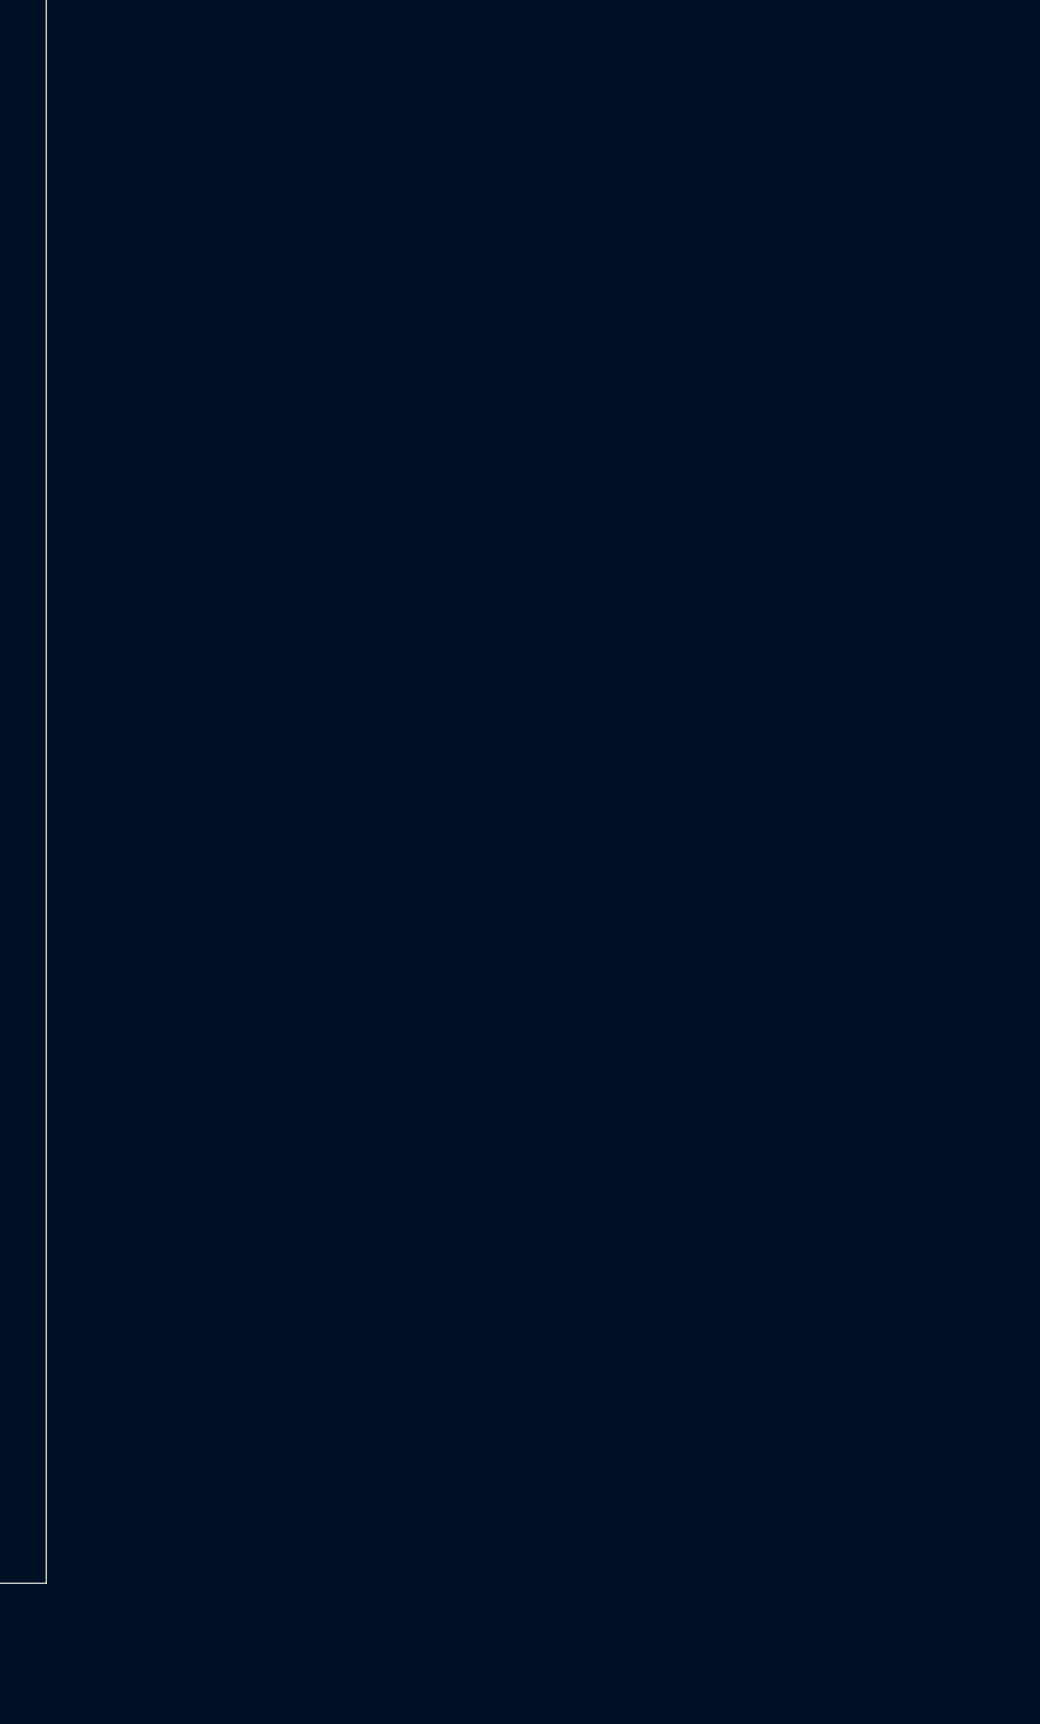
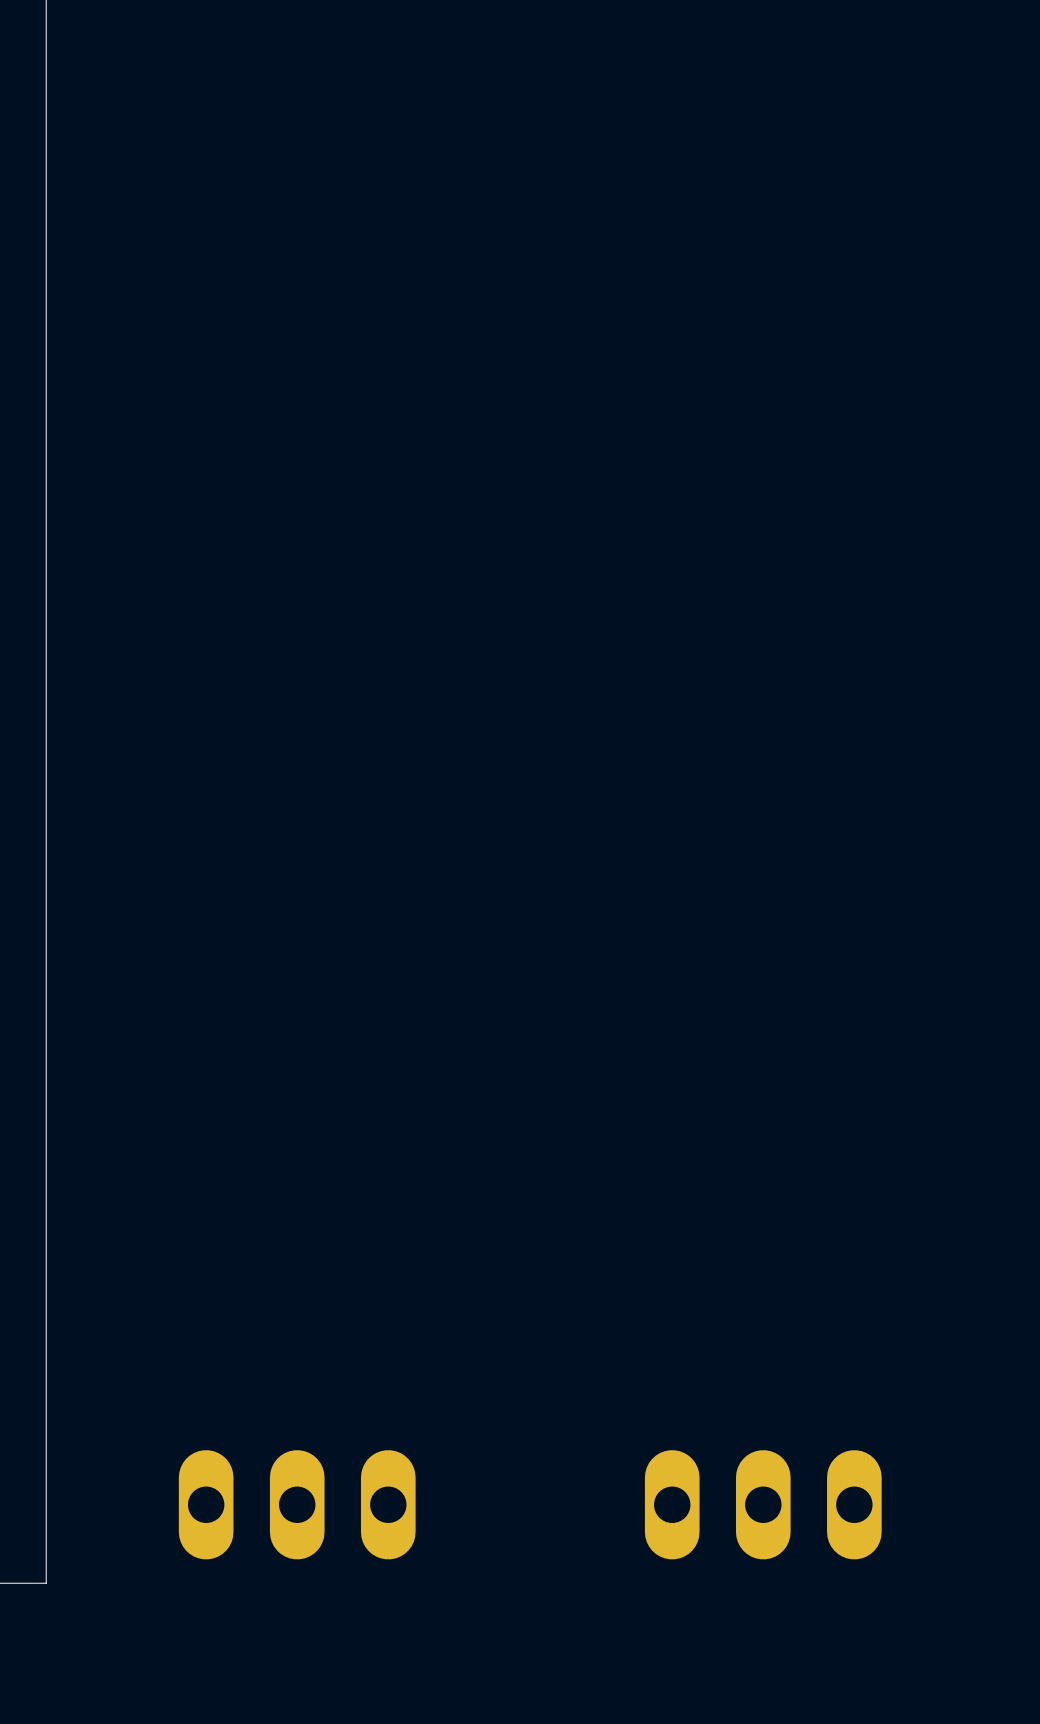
part: none -> (297, 1504)
part: none -> (763, 1504)

